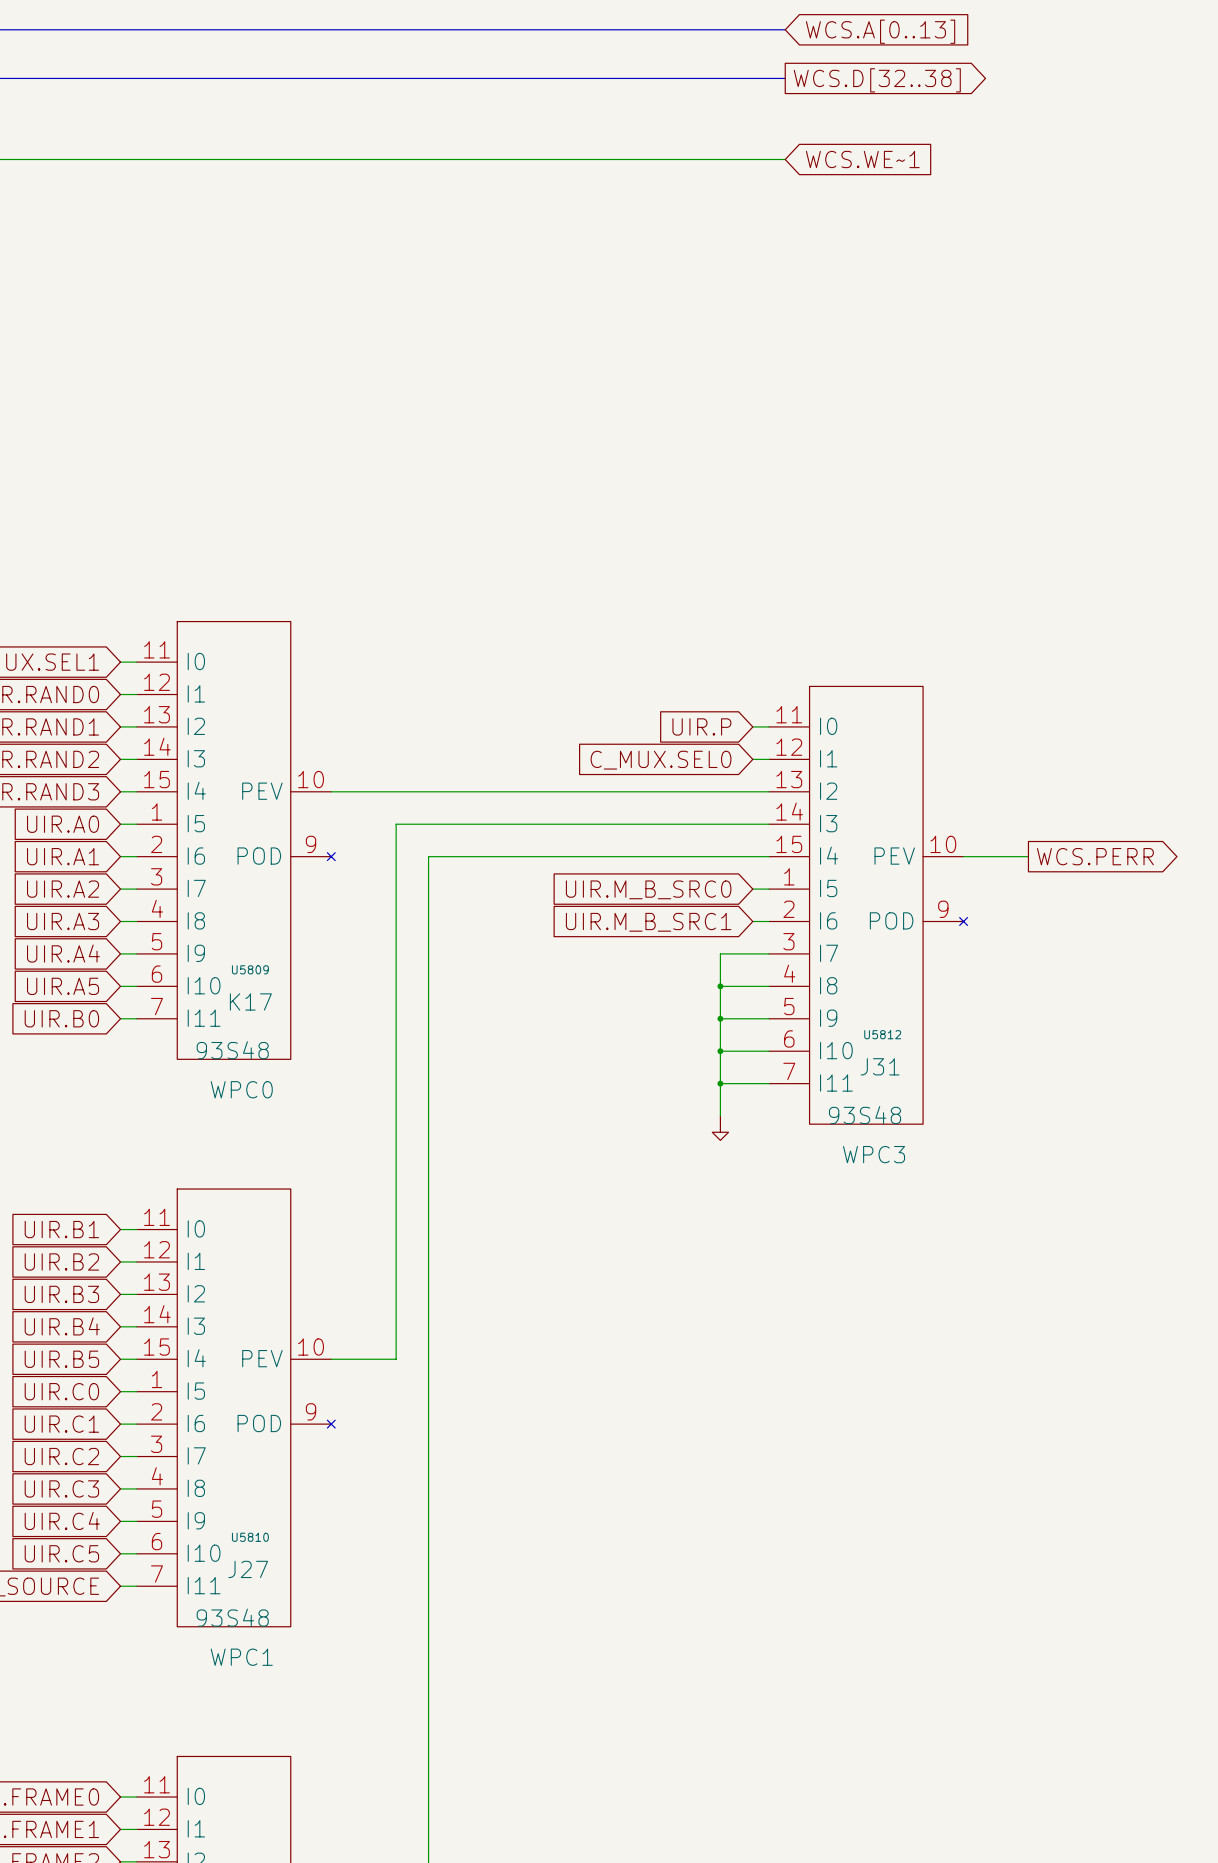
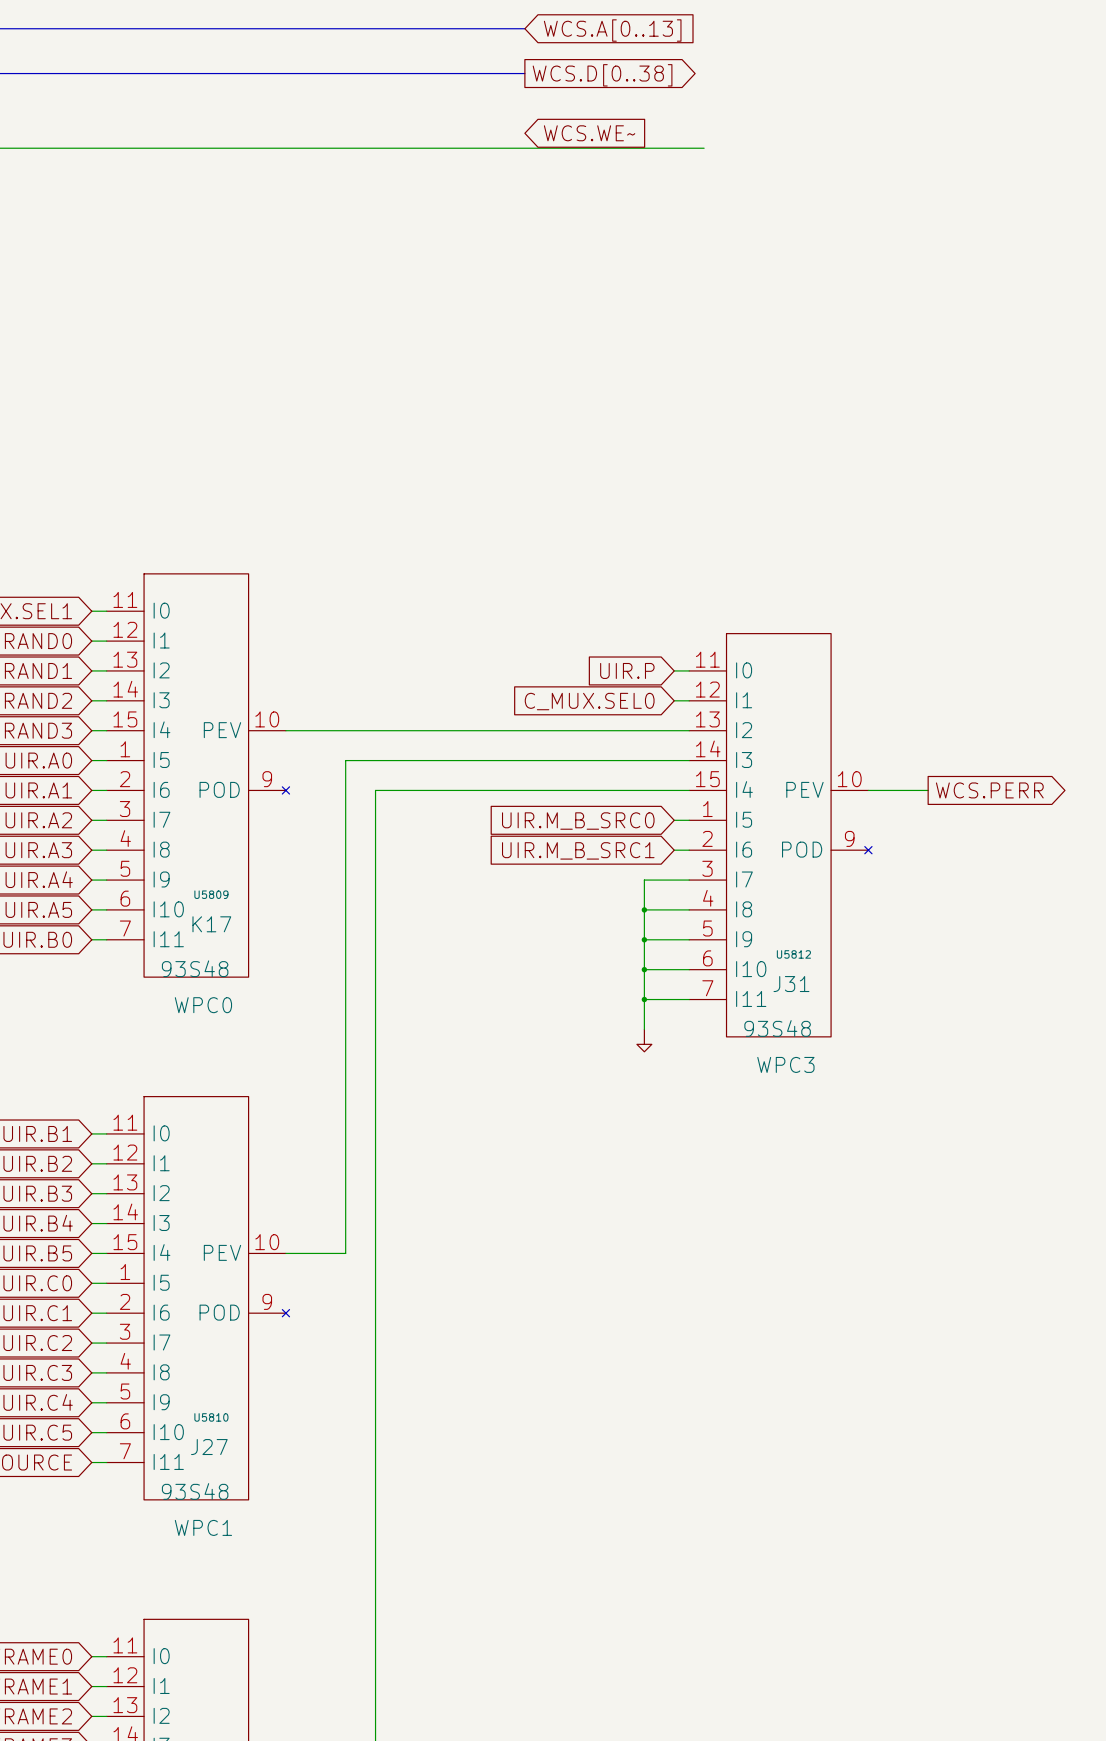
bus: (590, 29) (785, 29) -> none
global label: none -> WCS.A[0..13] (612, 30)
global label: WCS.A[0..13] (880, 31) -> none
bus: (590, 78) (785, 78) -> none
global label: none -> WCS.D[0..38] (602, 75)
global label: WCS.D[32..38] (877, 80) -> none
global label: none -> WCS.WE~ (589, 133)
global label: WCS.WE~1 (862, 159) -> none

